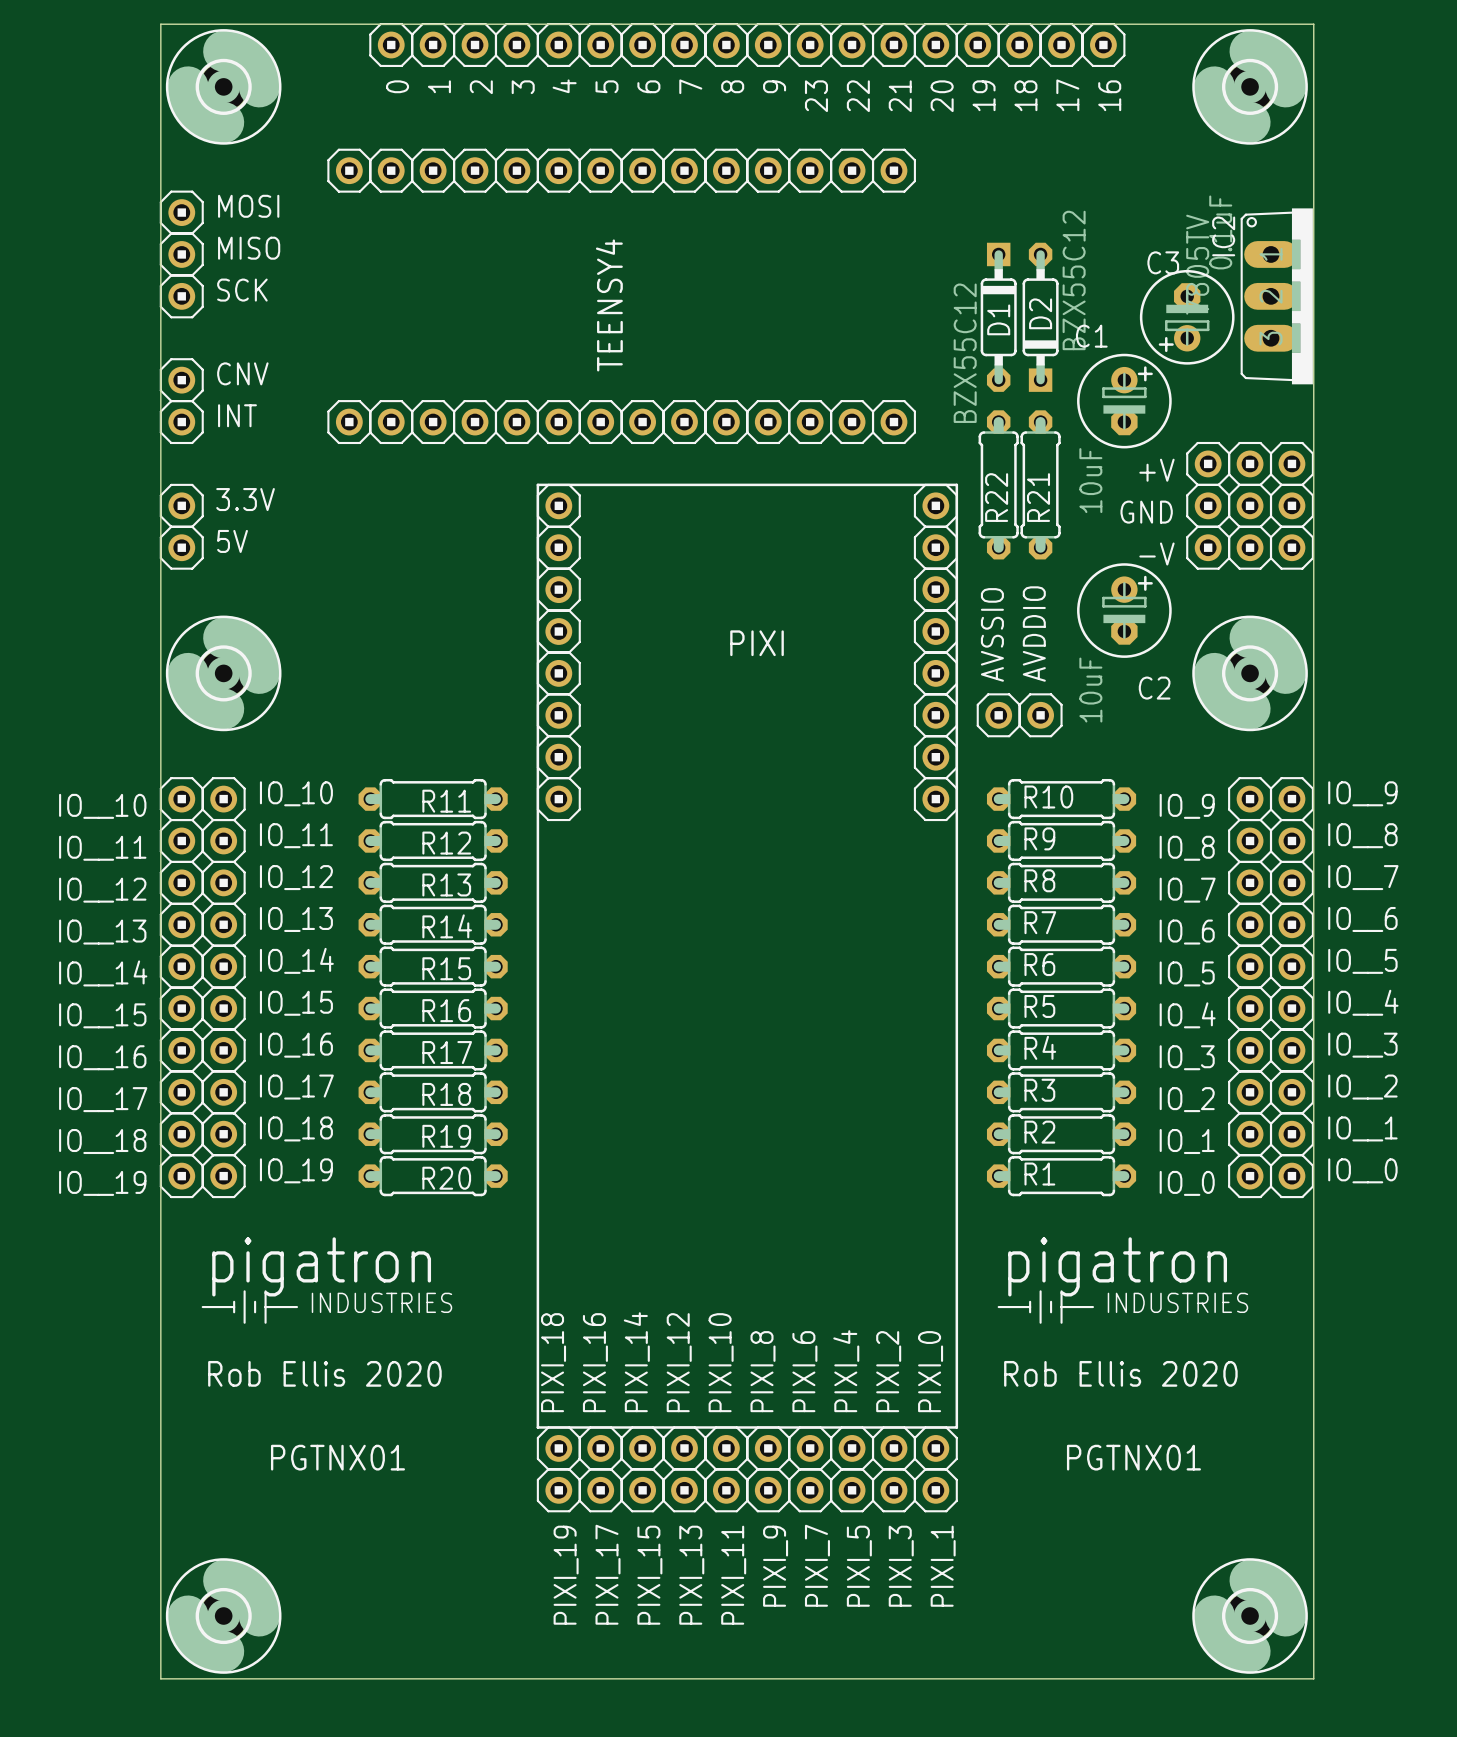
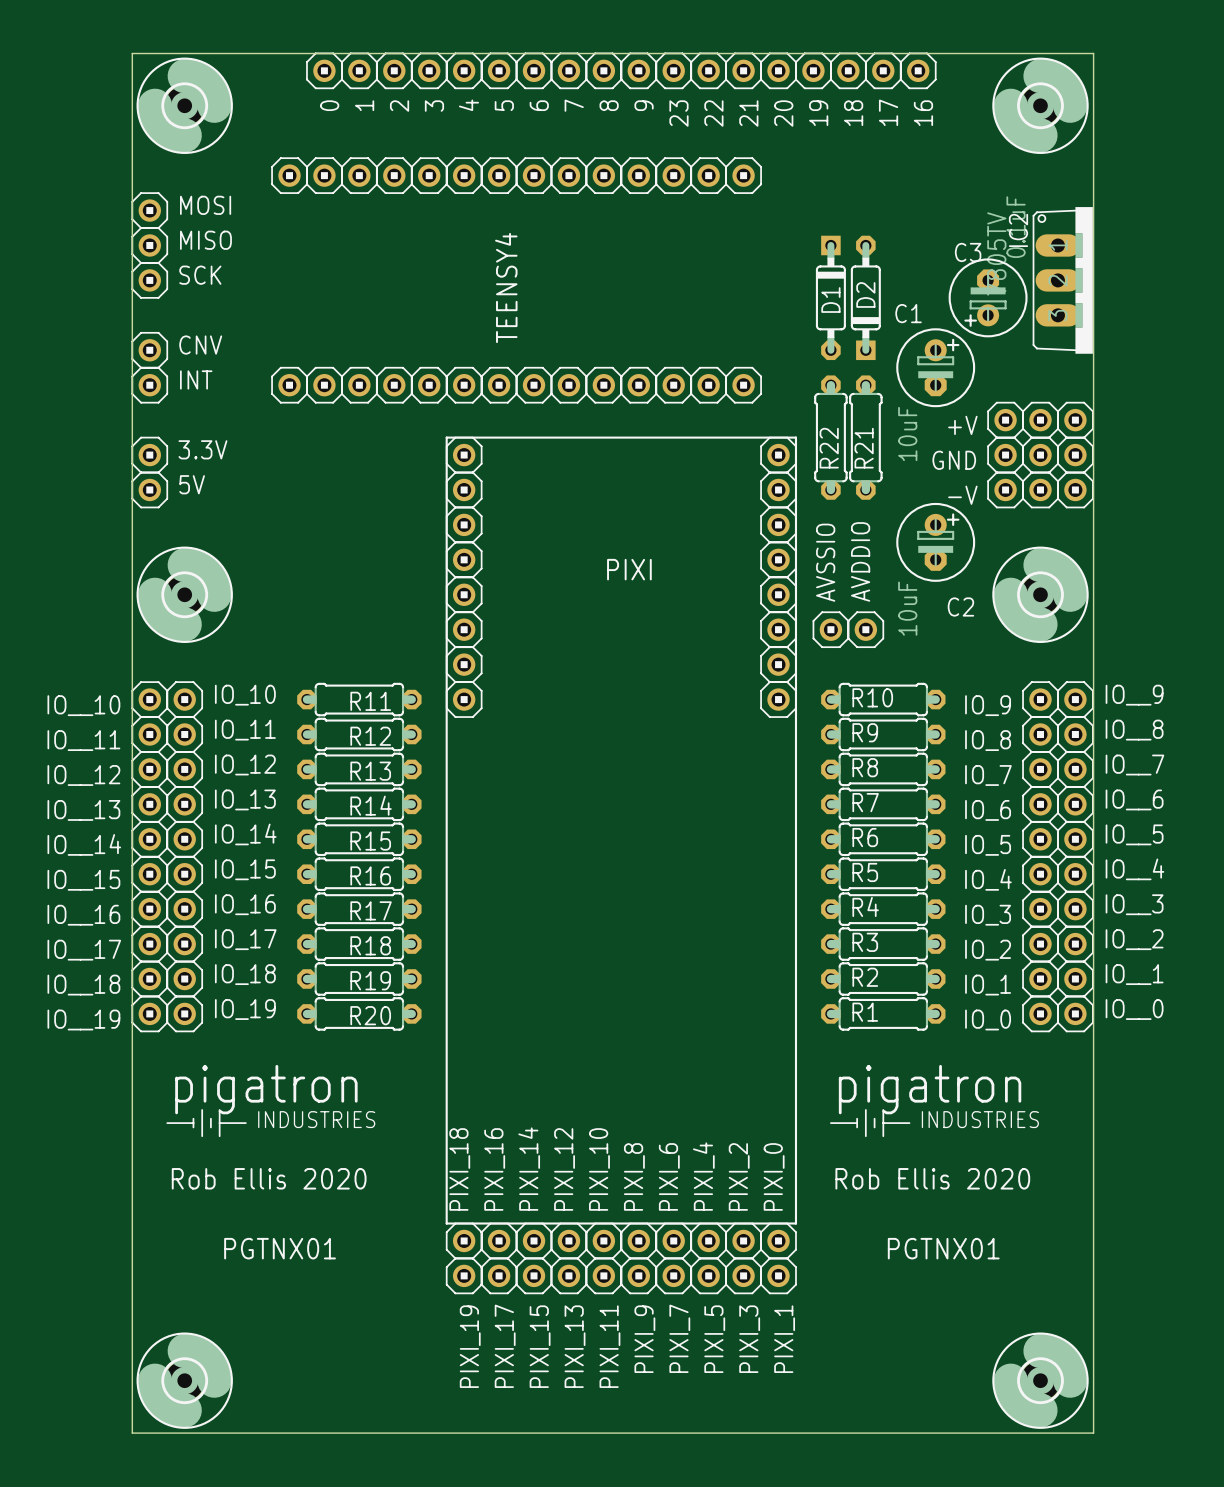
D2 value: BZX55C12 (1074, 280) -> none
D1 value: BZX55C12 (965, 353) -> none

